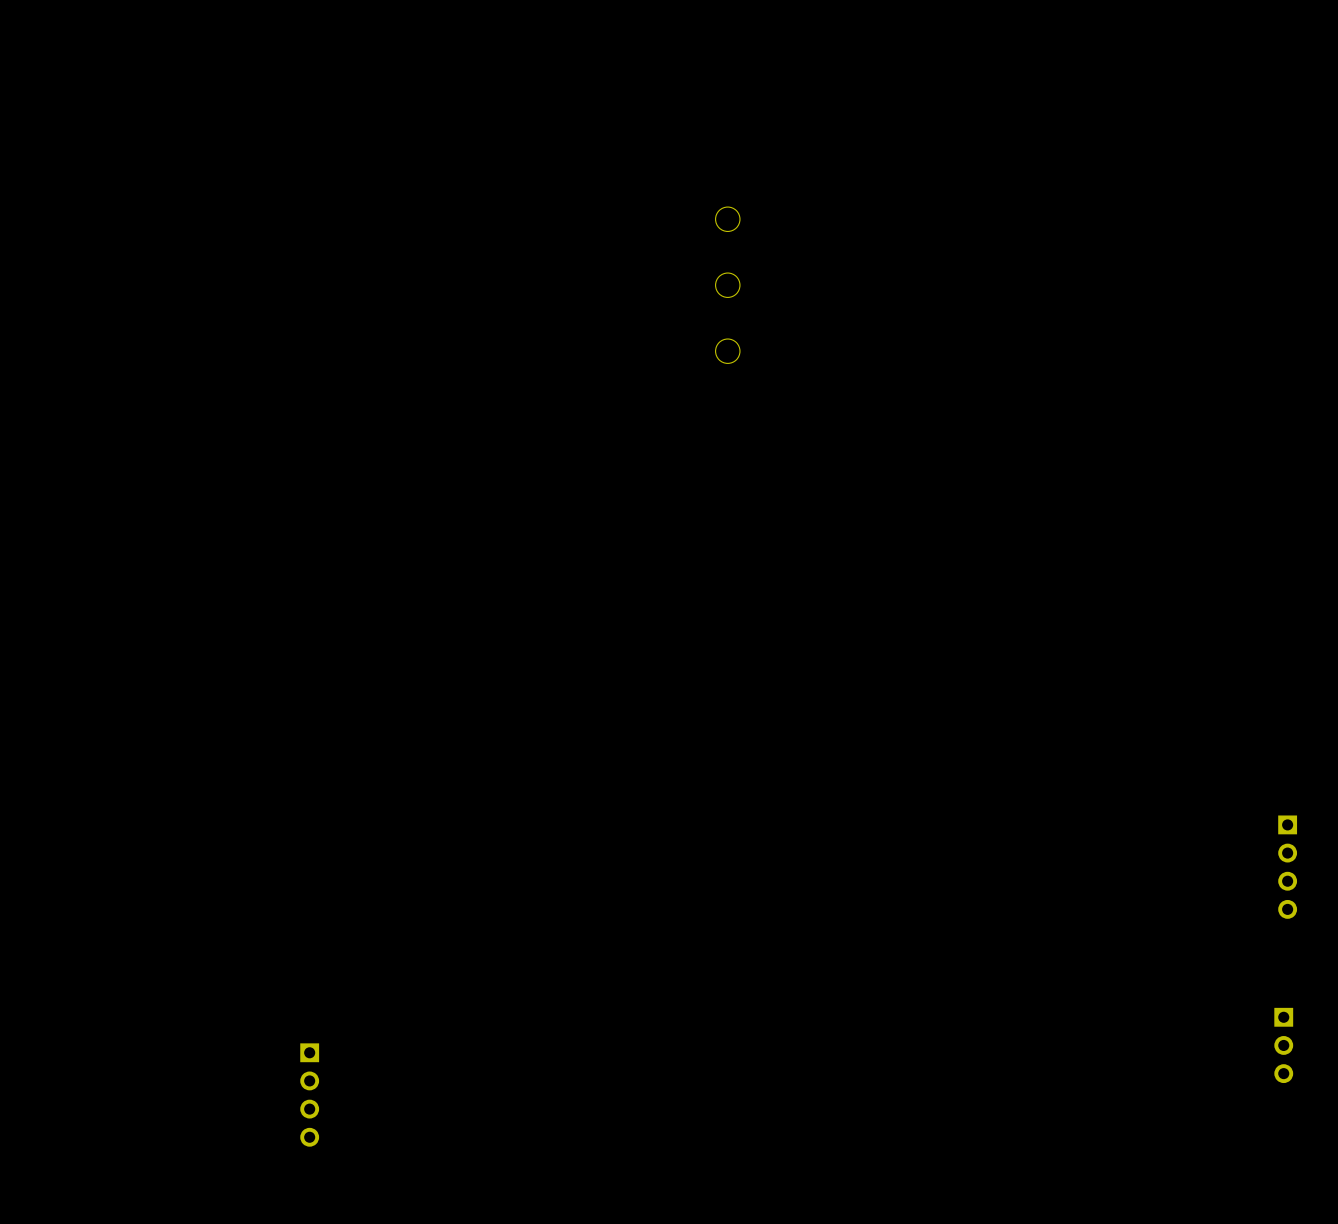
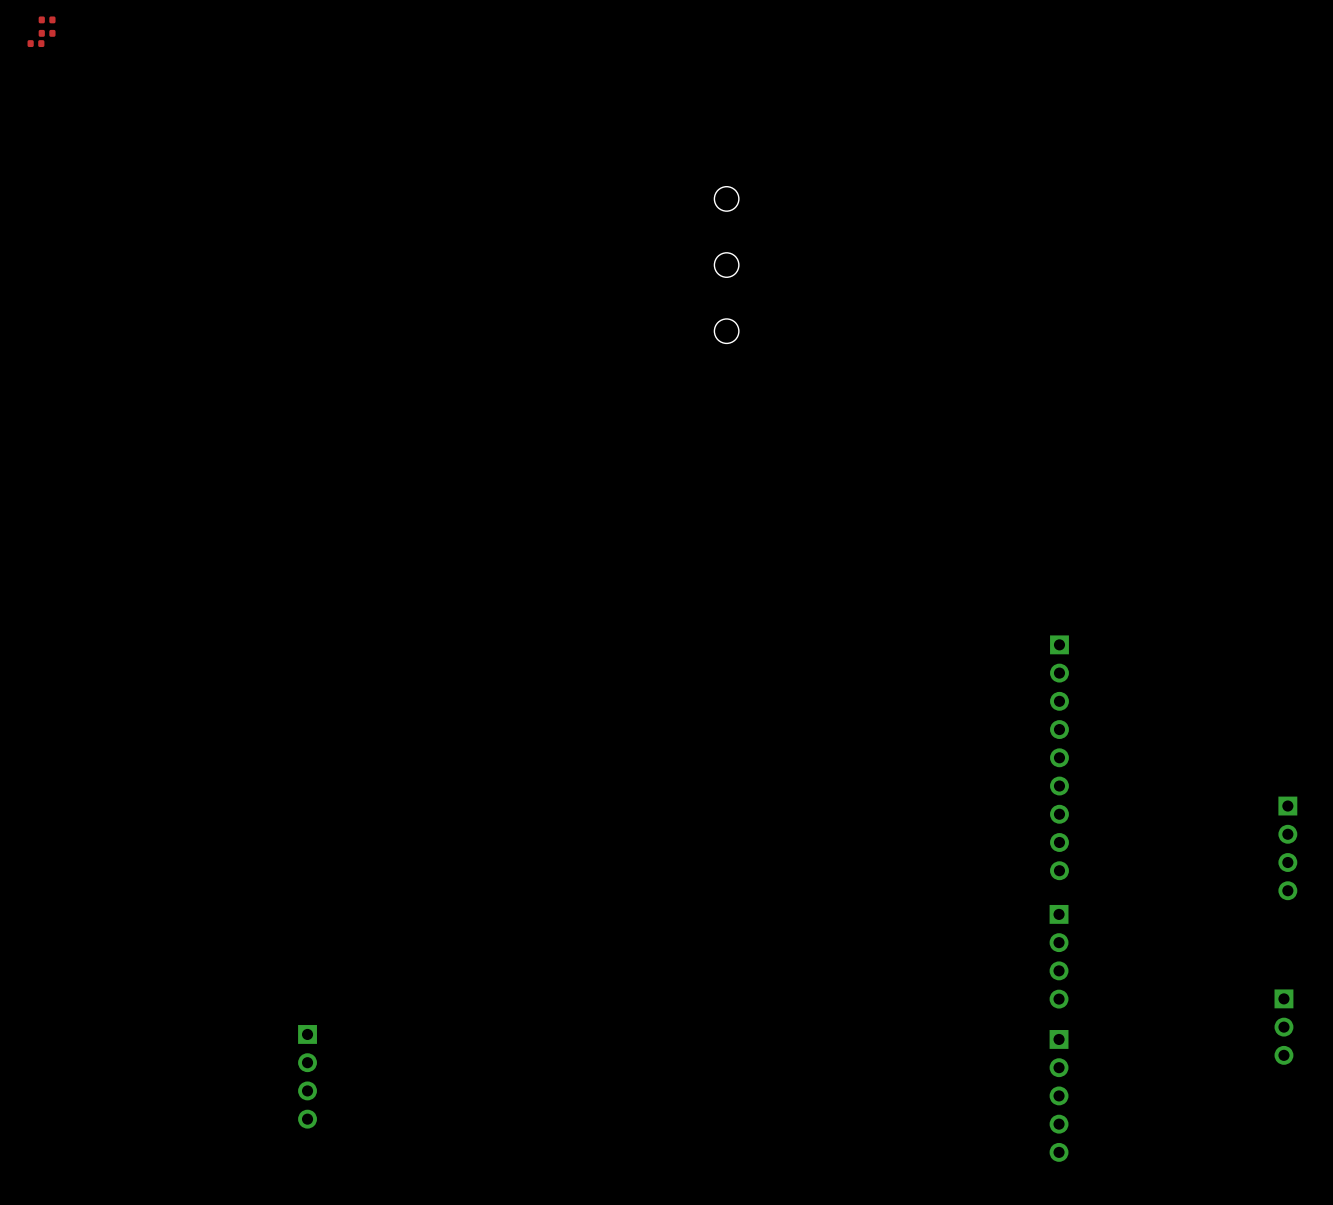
part: none -> (47, 19)
part: none -> (47, 33)
part: none -> (35, 43)
part: none -> (1059, 757)
part: none -> (1059, 956)
part: none -> (1059, 1095)

